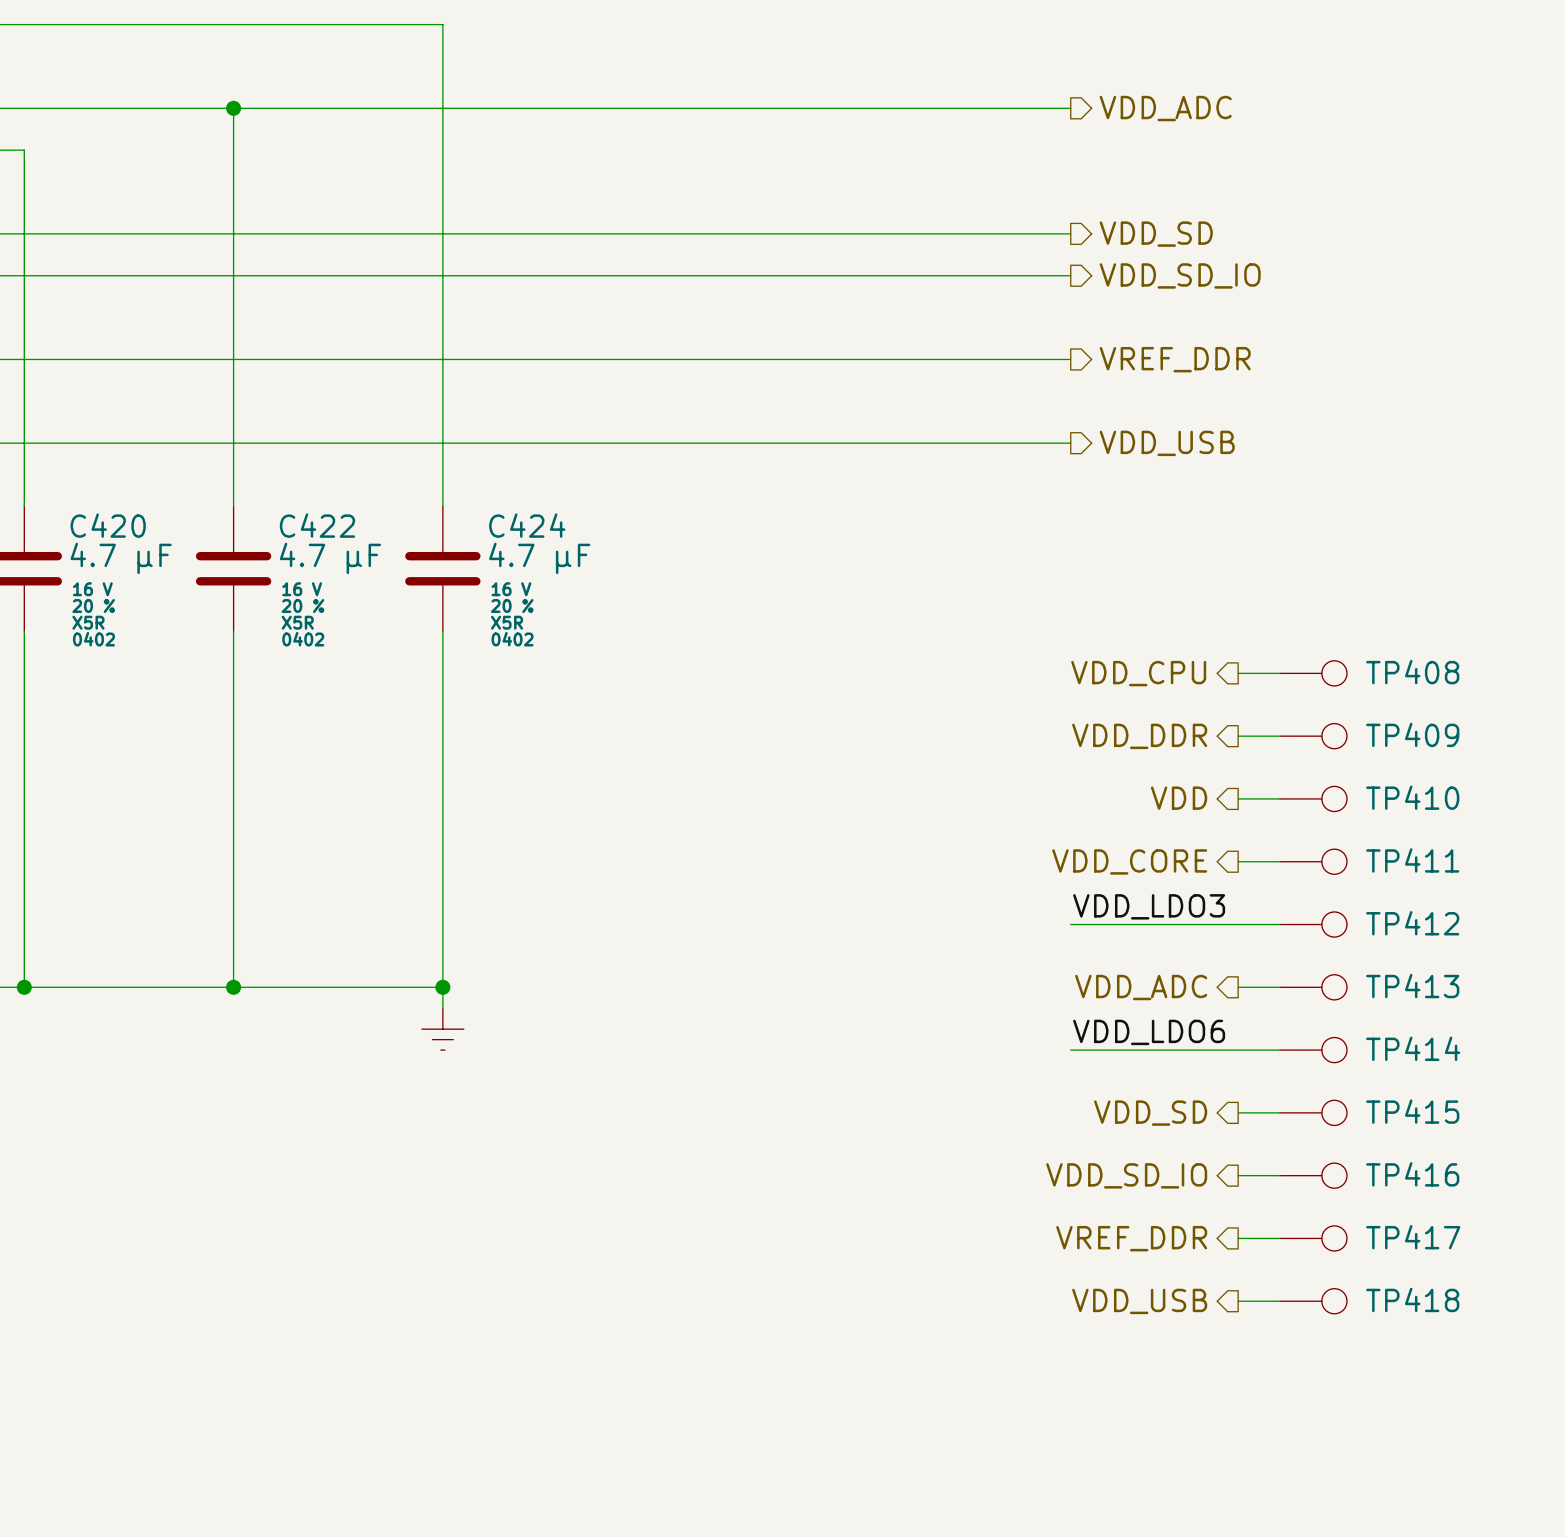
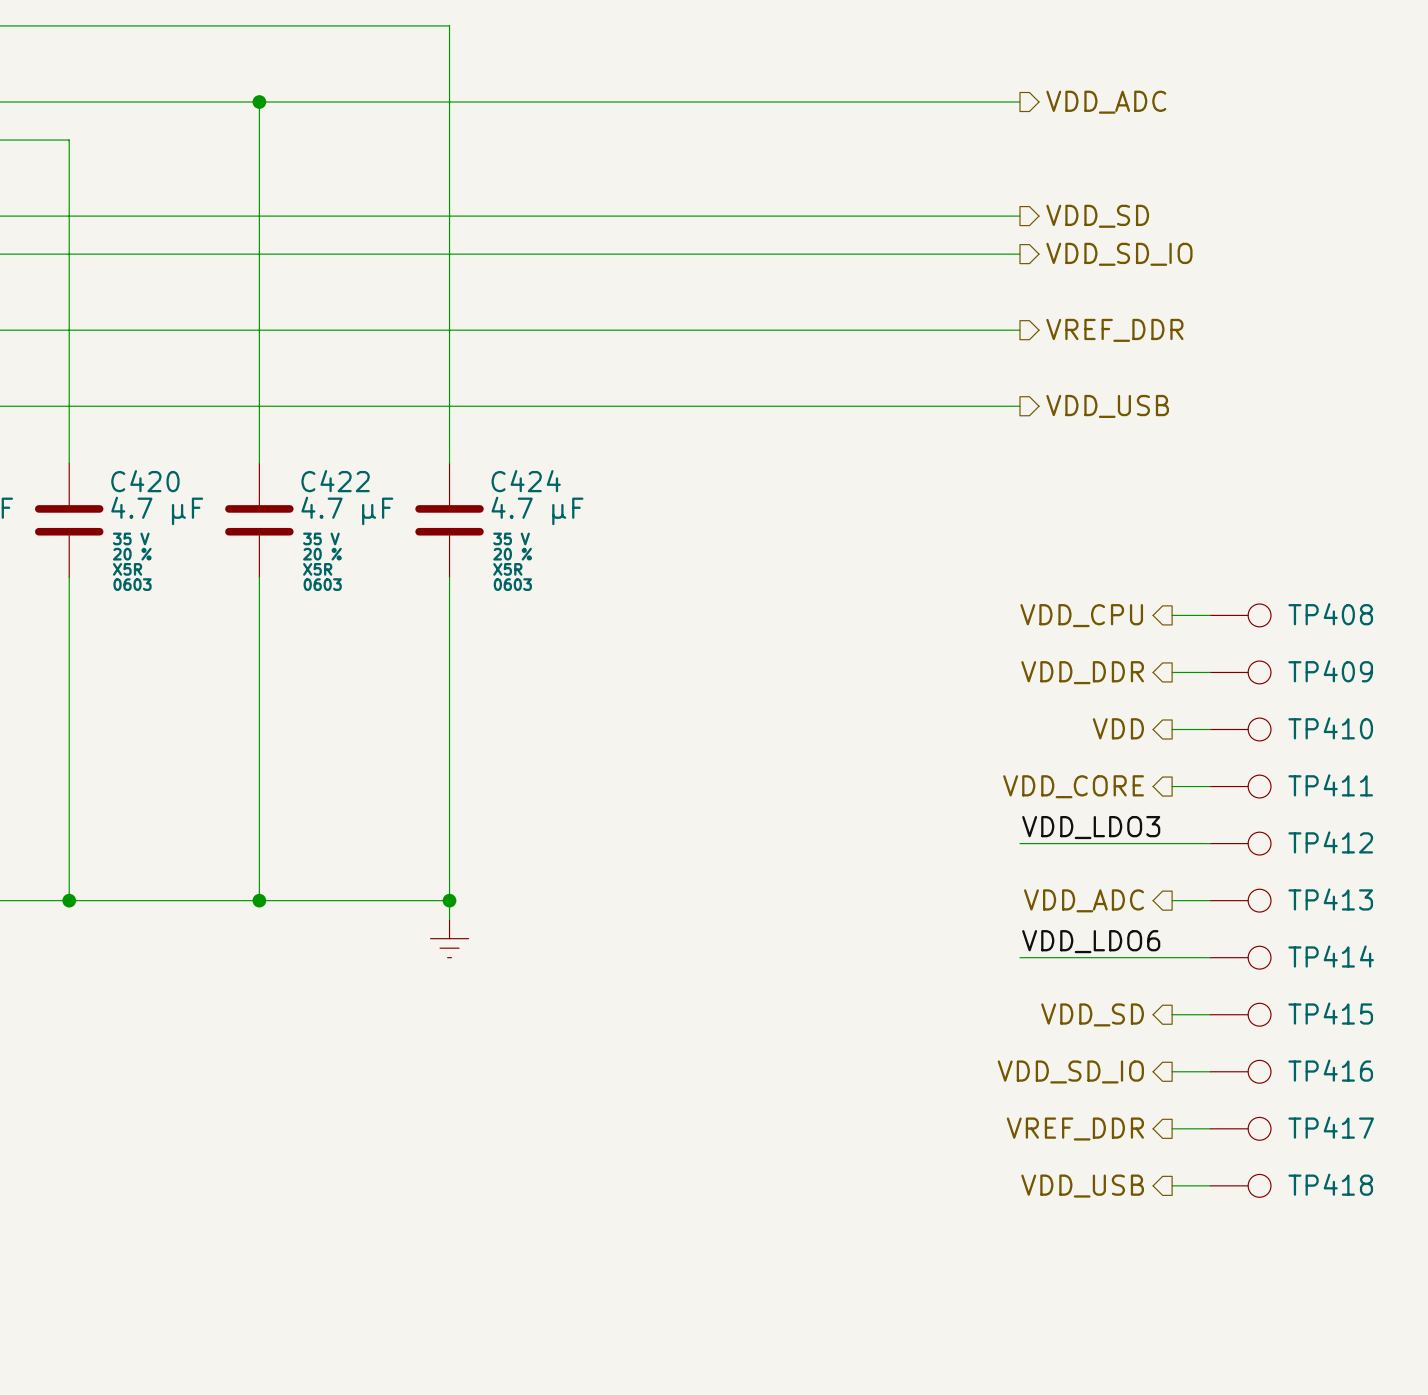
C420 text: 16 V (92, 589) -> 35 V (131, 538)
C422 text: 16 V (302, 589) -> 35 V (321, 538)
C424 text: 16 V (511, 589) -> 35 V (511, 538)
C420 text: 0402 (93, 639) -> 0603 (132, 584)
C422 text: 0402 (303, 639) -> 0603 (322, 584)
C424 text: 0402 (512, 639) -> 0603 (512, 584)

